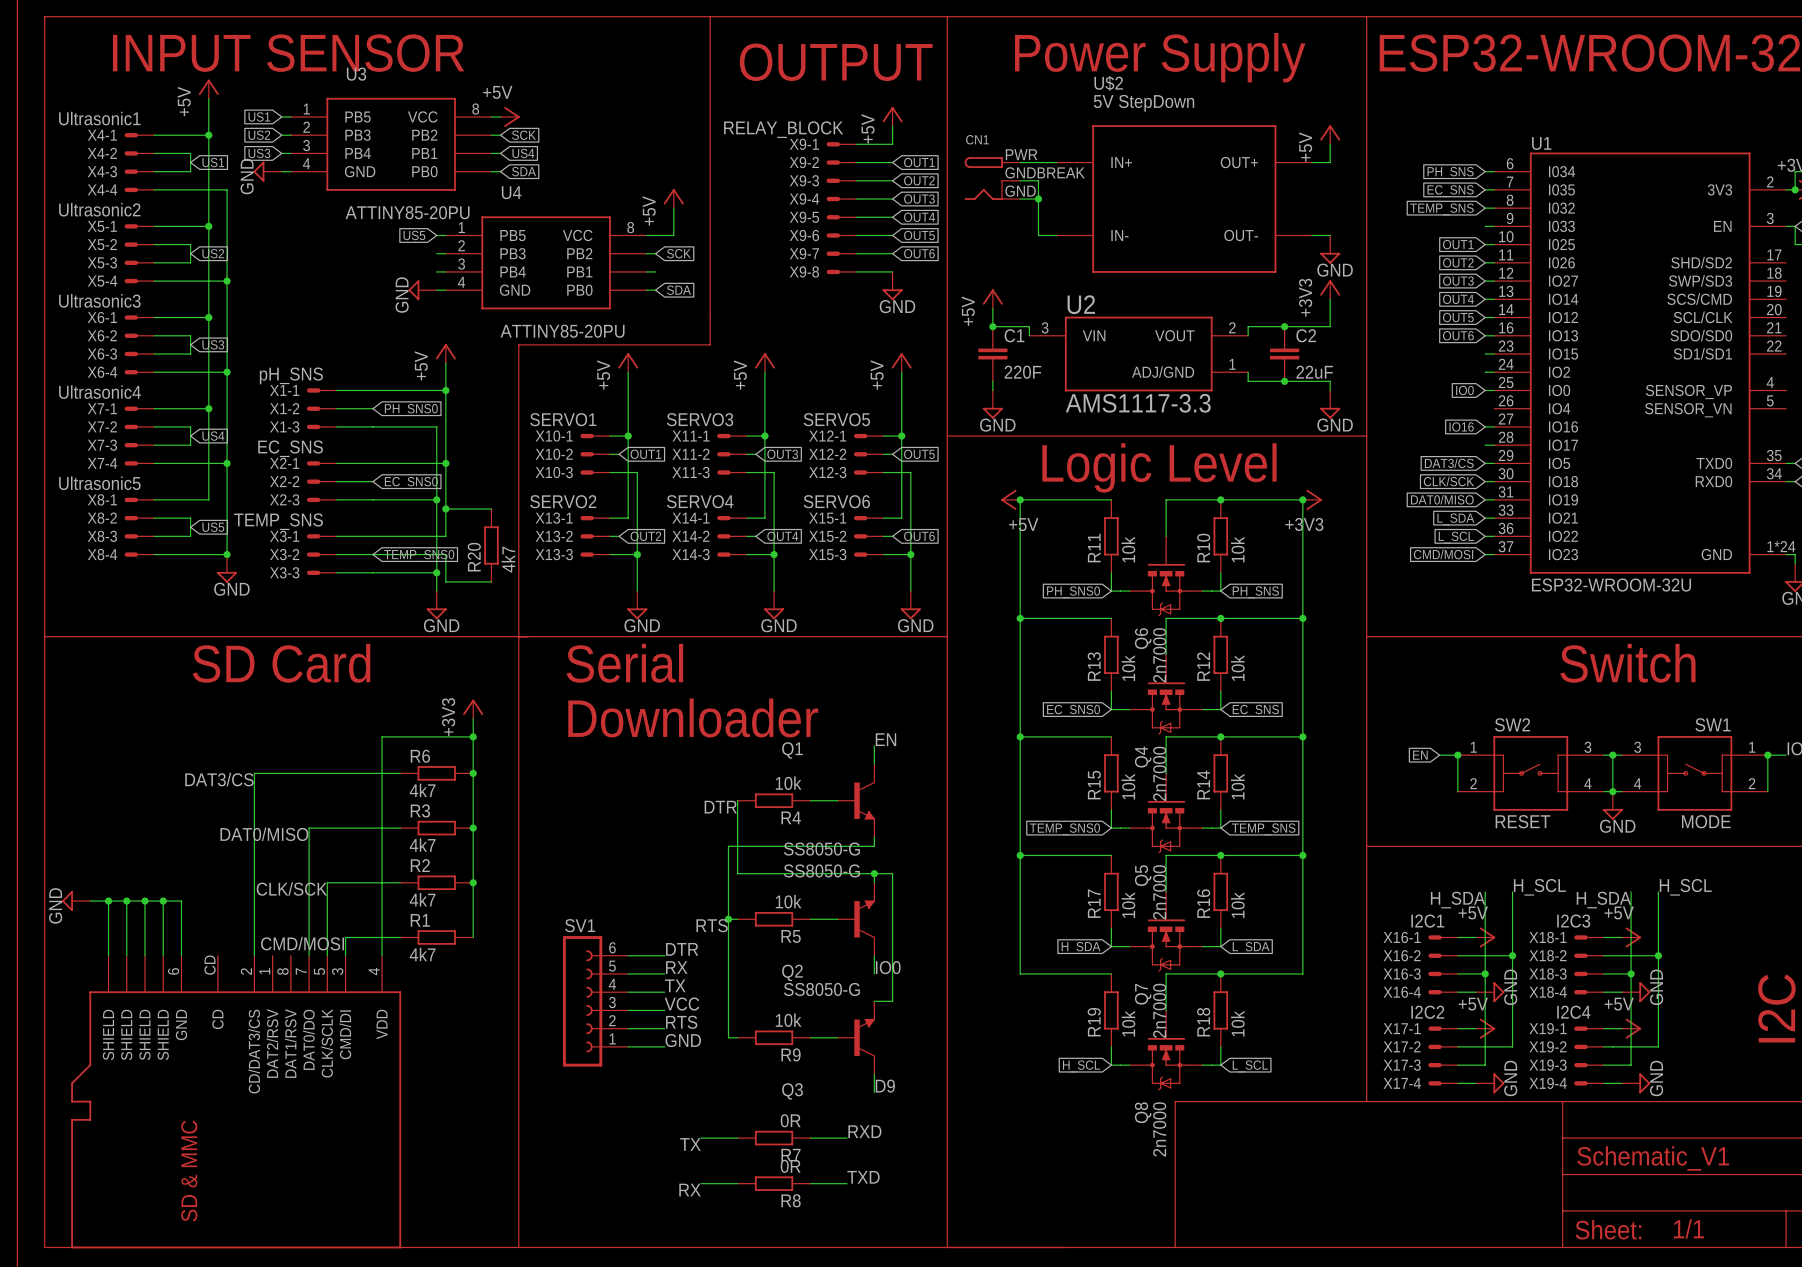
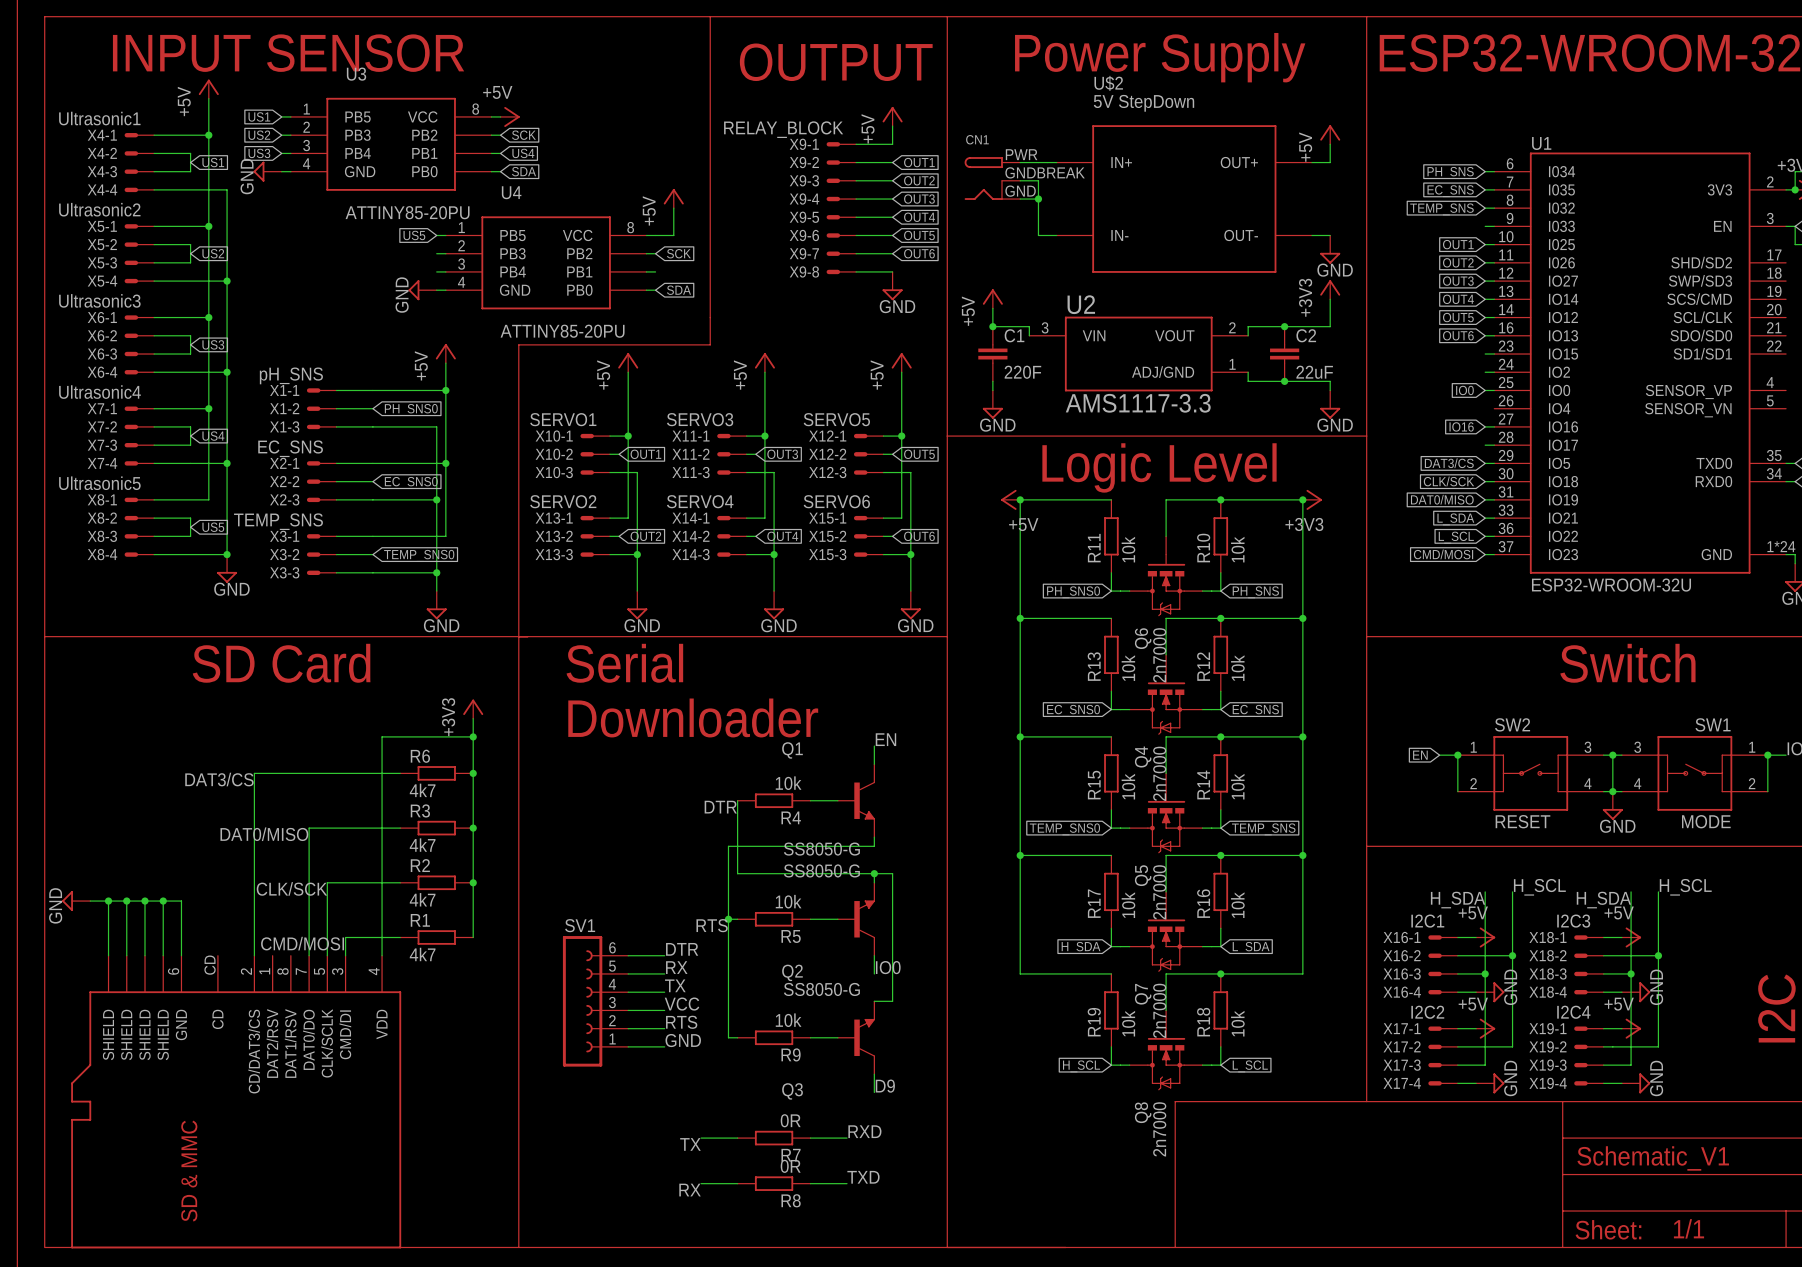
wire: (445, 509) (491, 509) -> none
junction: (445, 509) -> none
R20: 4k7 (491, 545) -> none
wire: (372, 554) (445, 554) (445, 581) (491, 581) -> none

